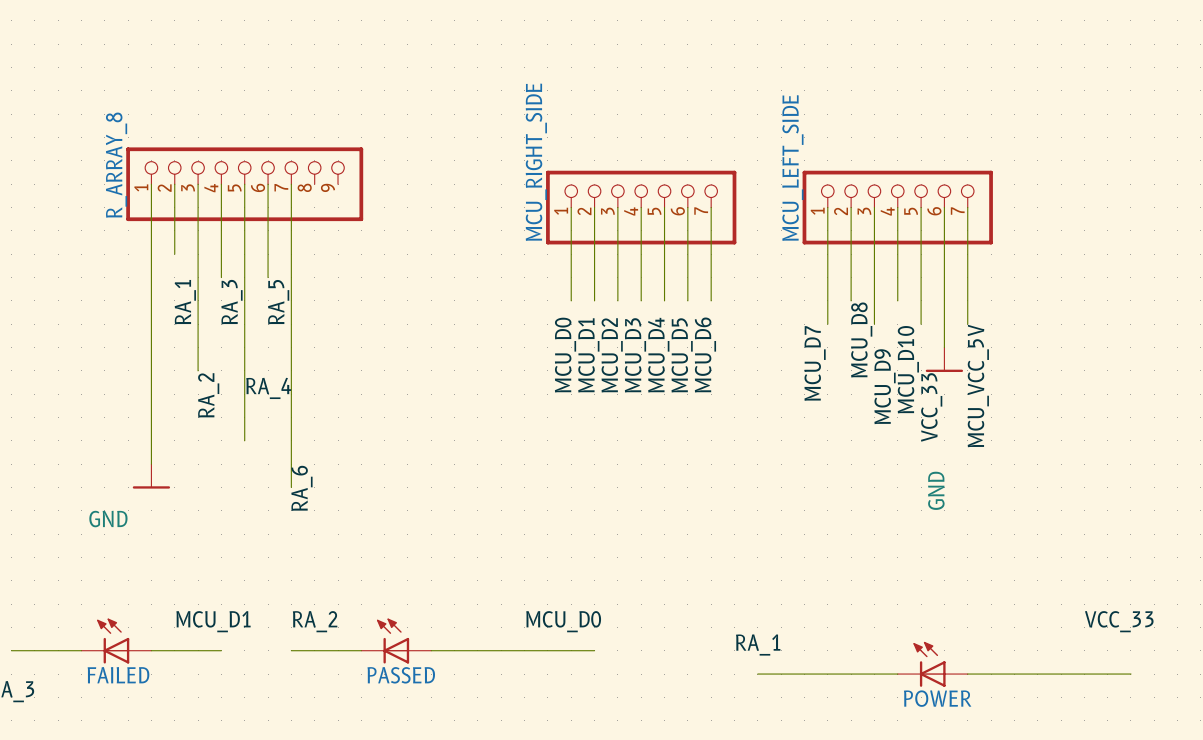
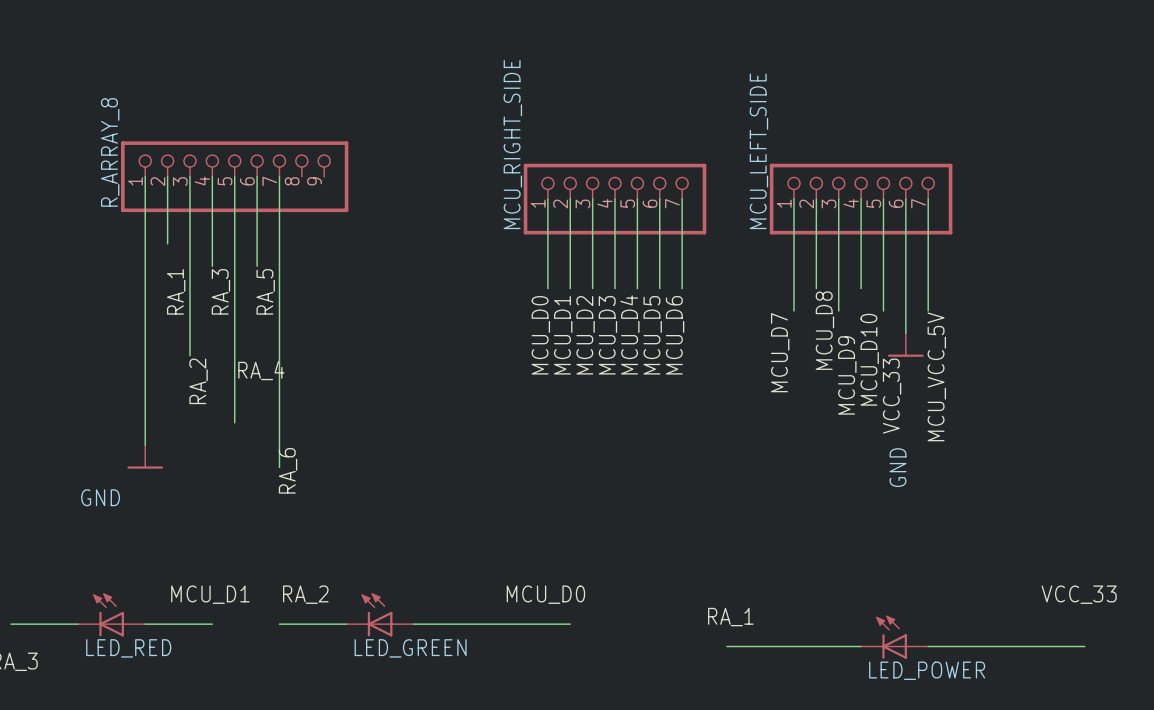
FAILED name: FAILED (118, 675) -> LED_RED (128, 648)
PASSED name: PASSED (401, 675) -> LED_GREEN (410, 648)
POWER name: POWER (937, 698) -> LED_POWER (927, 670)

